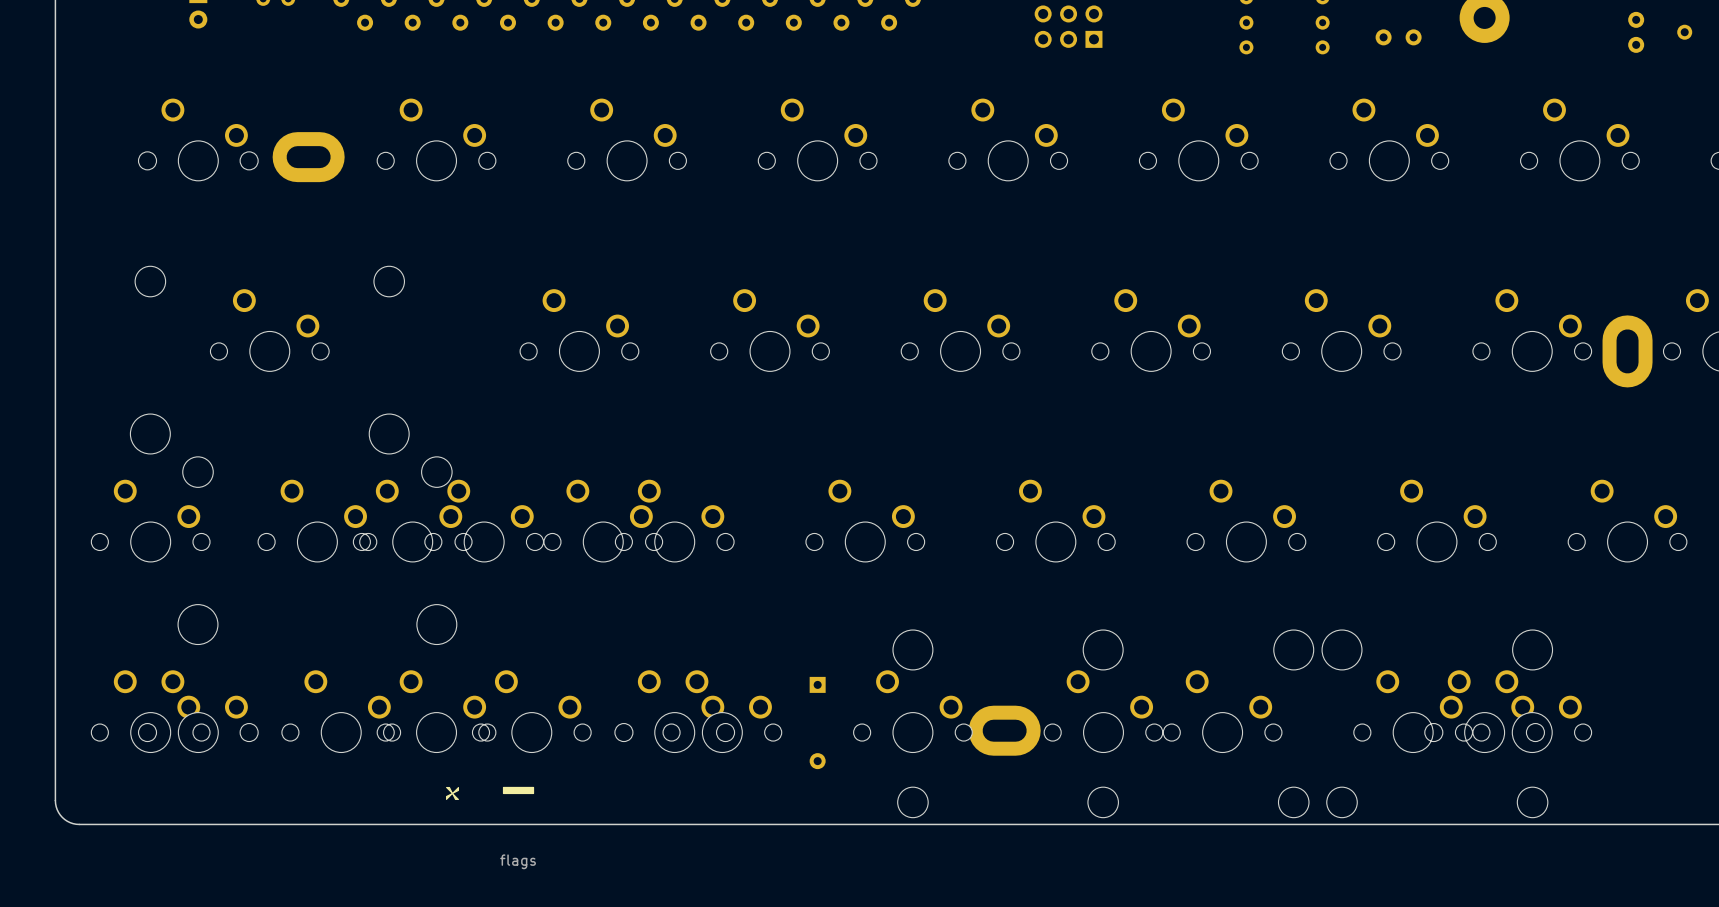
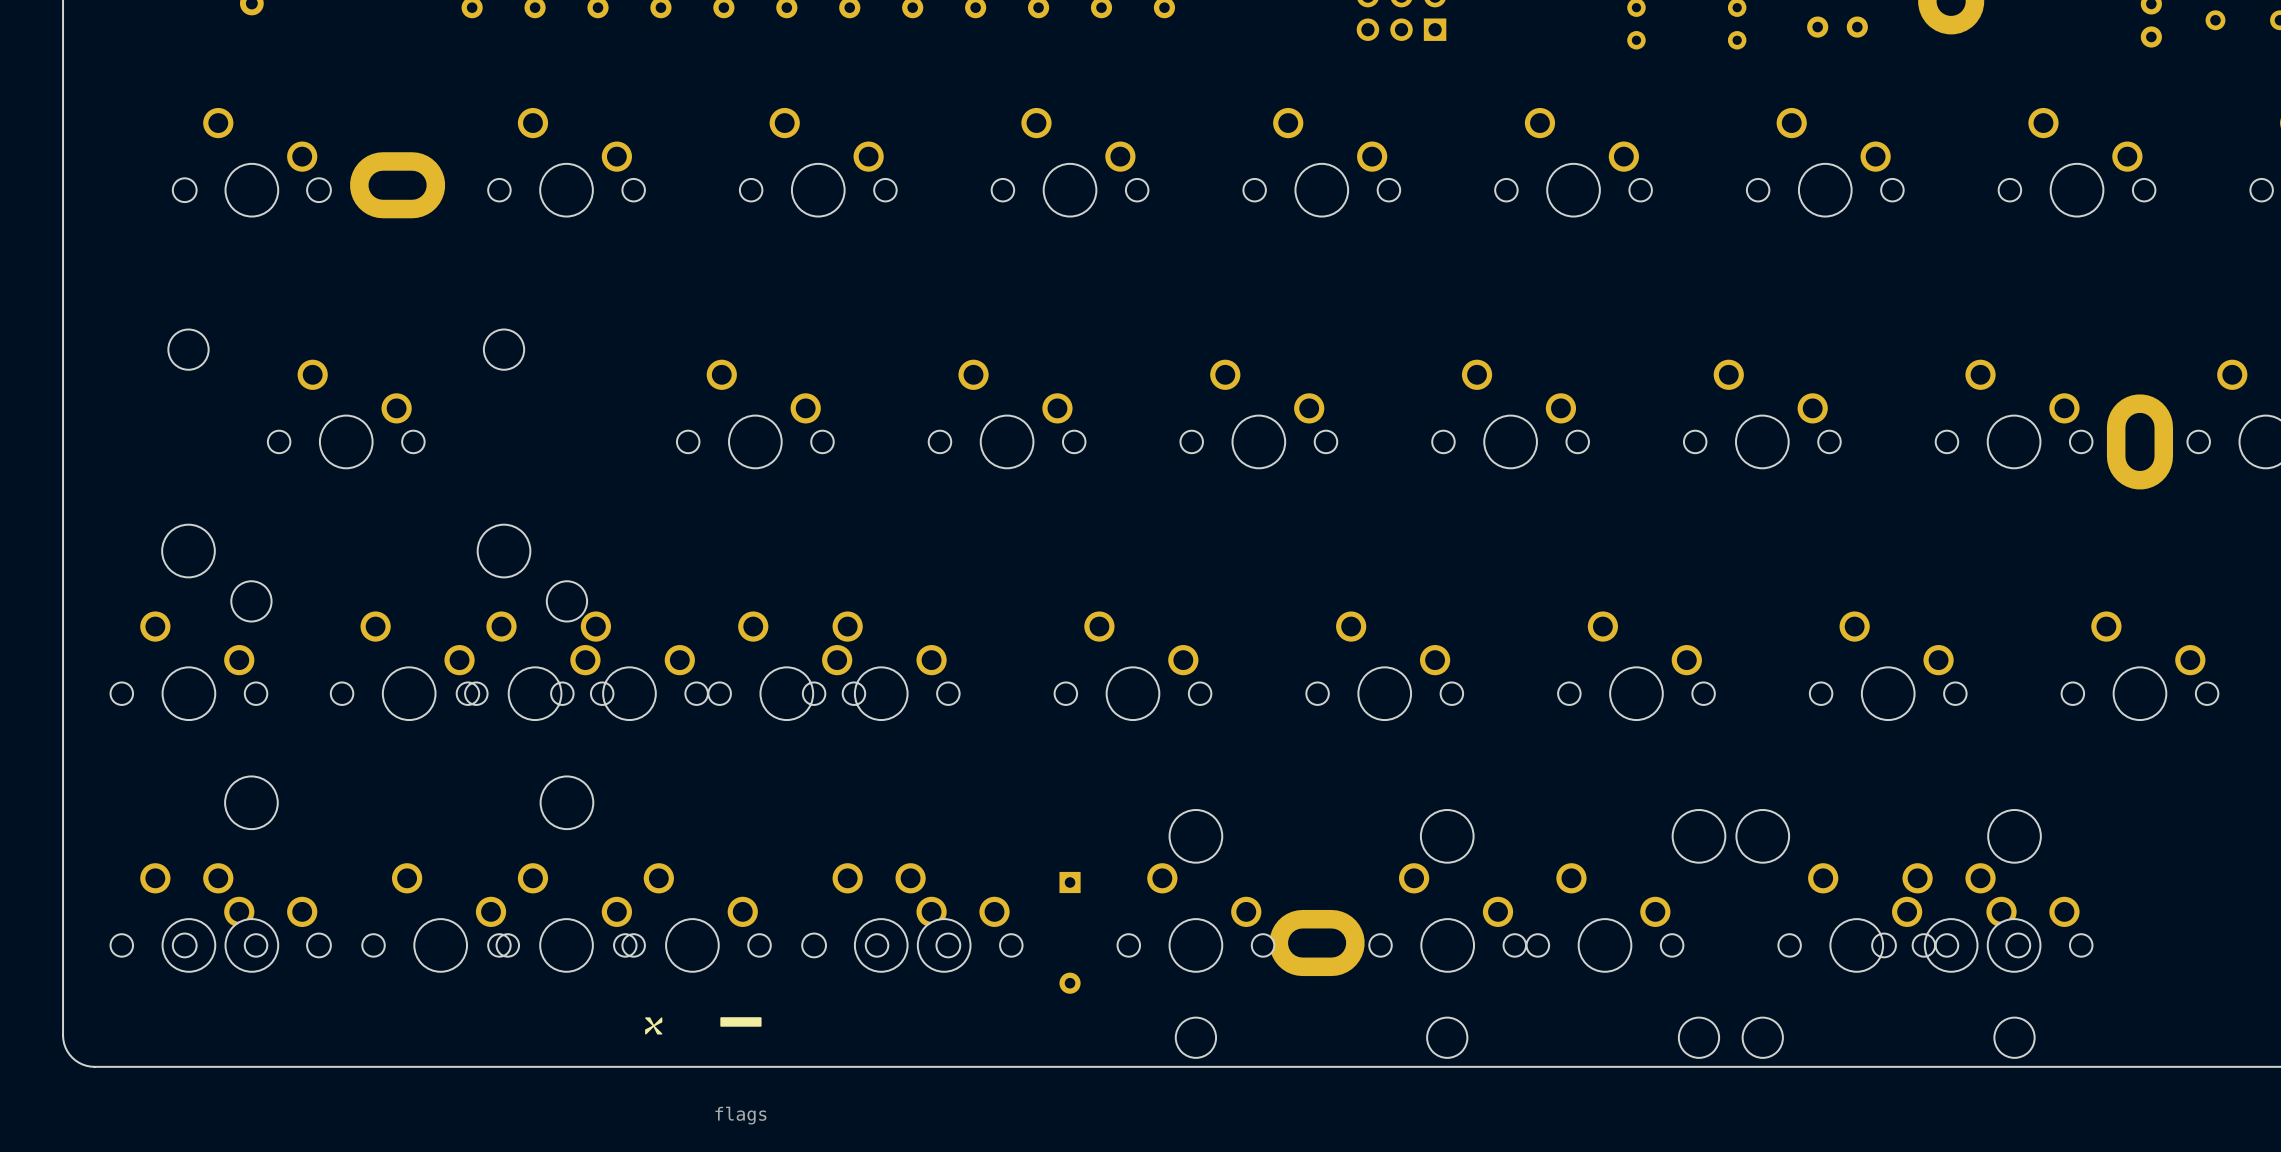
drawing position: (490, 793) -> (703, 1025)

